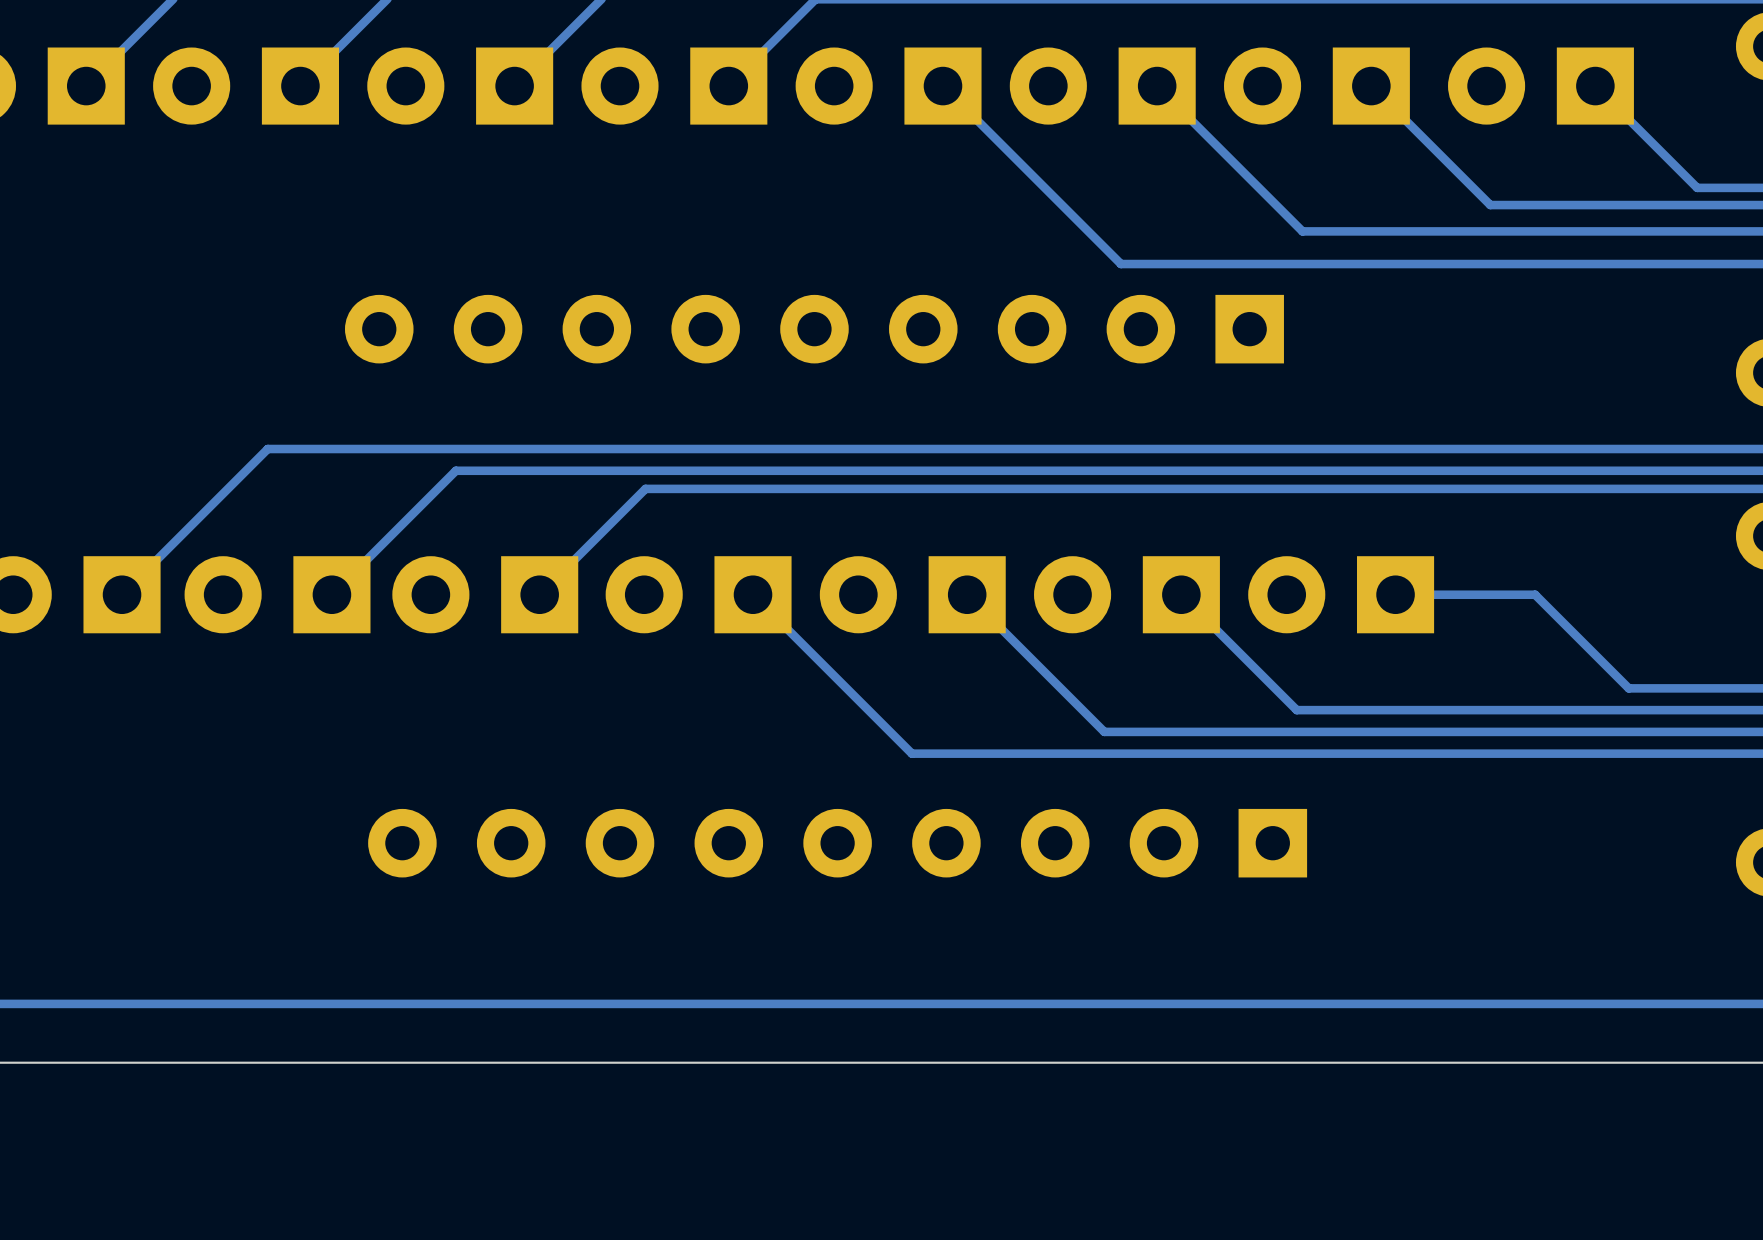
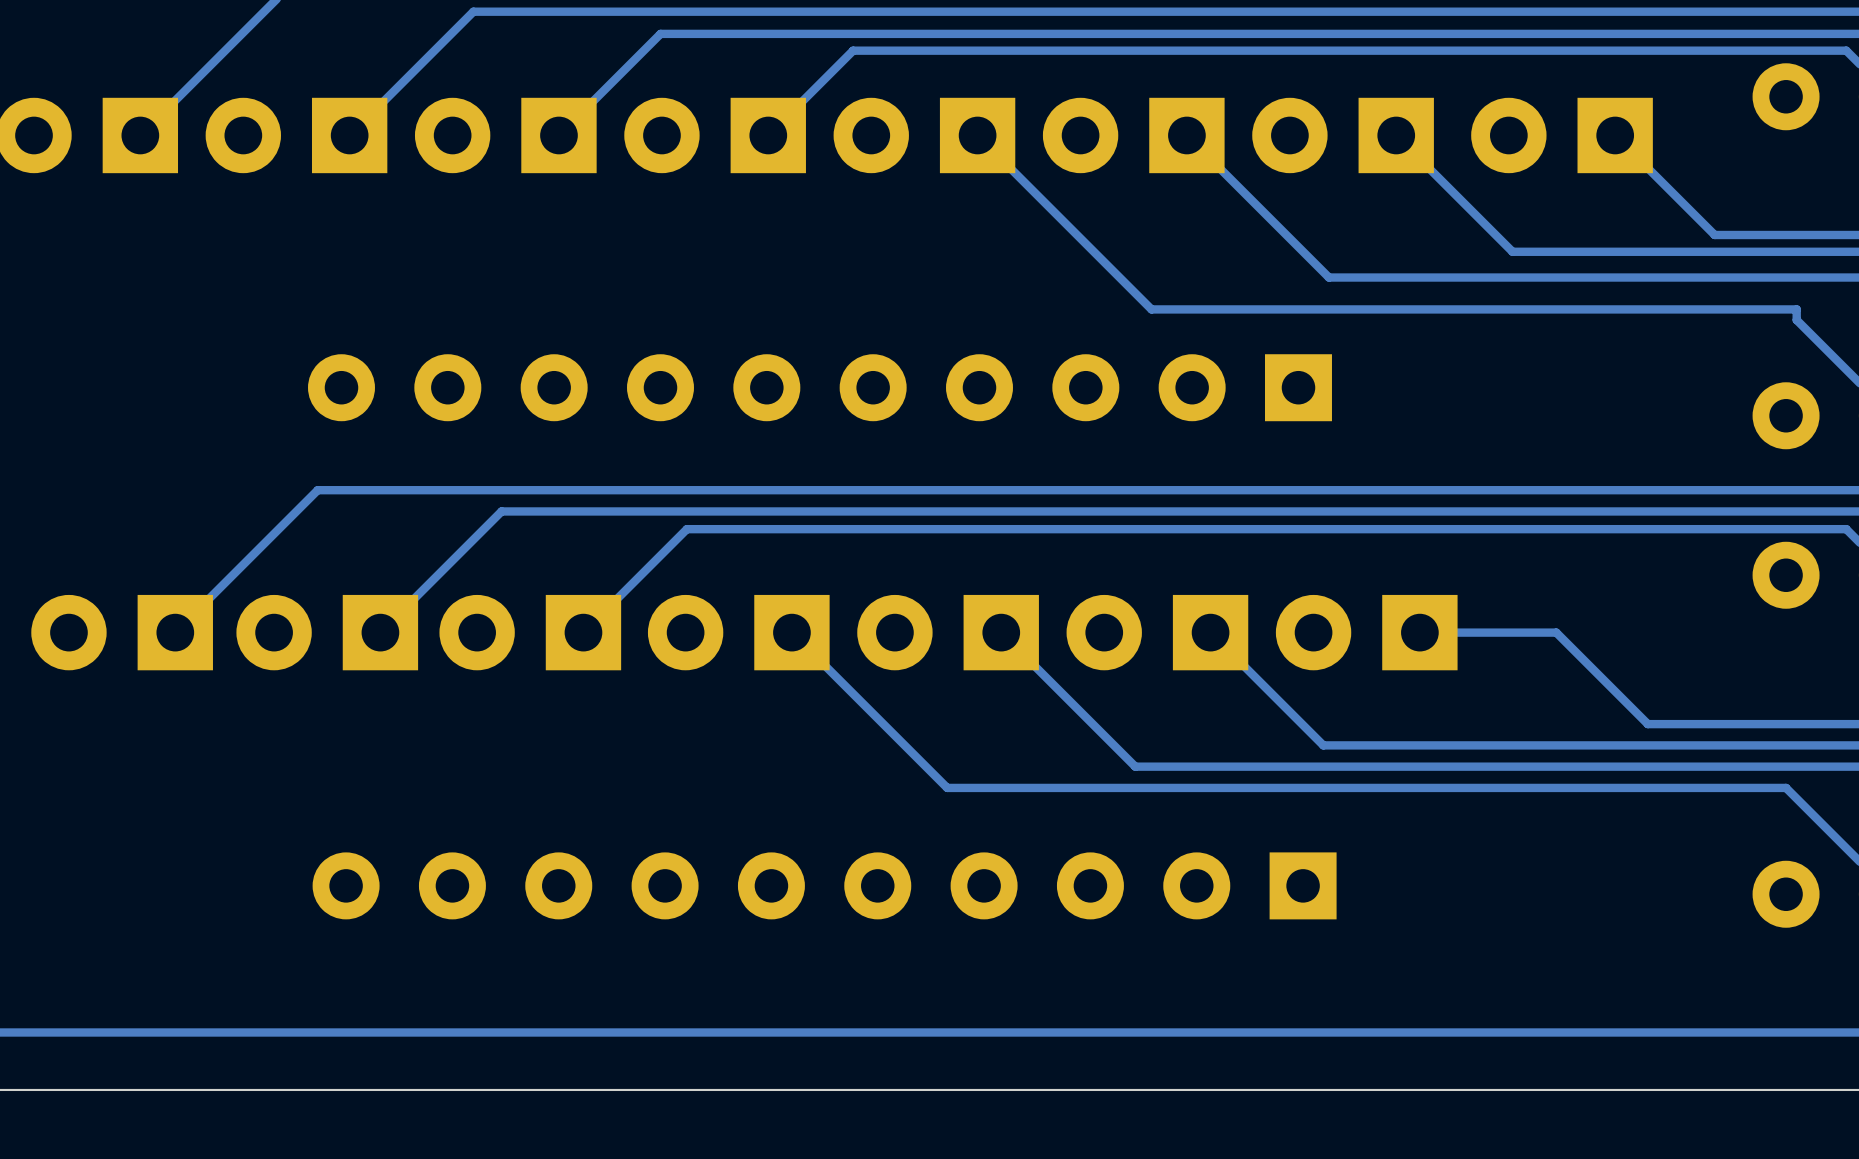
part footprint: [344, 294, 1284, 364] -> [308, 354, 1332, 422]
part: (837, 843) -> none
part: none -> (824, 885)

